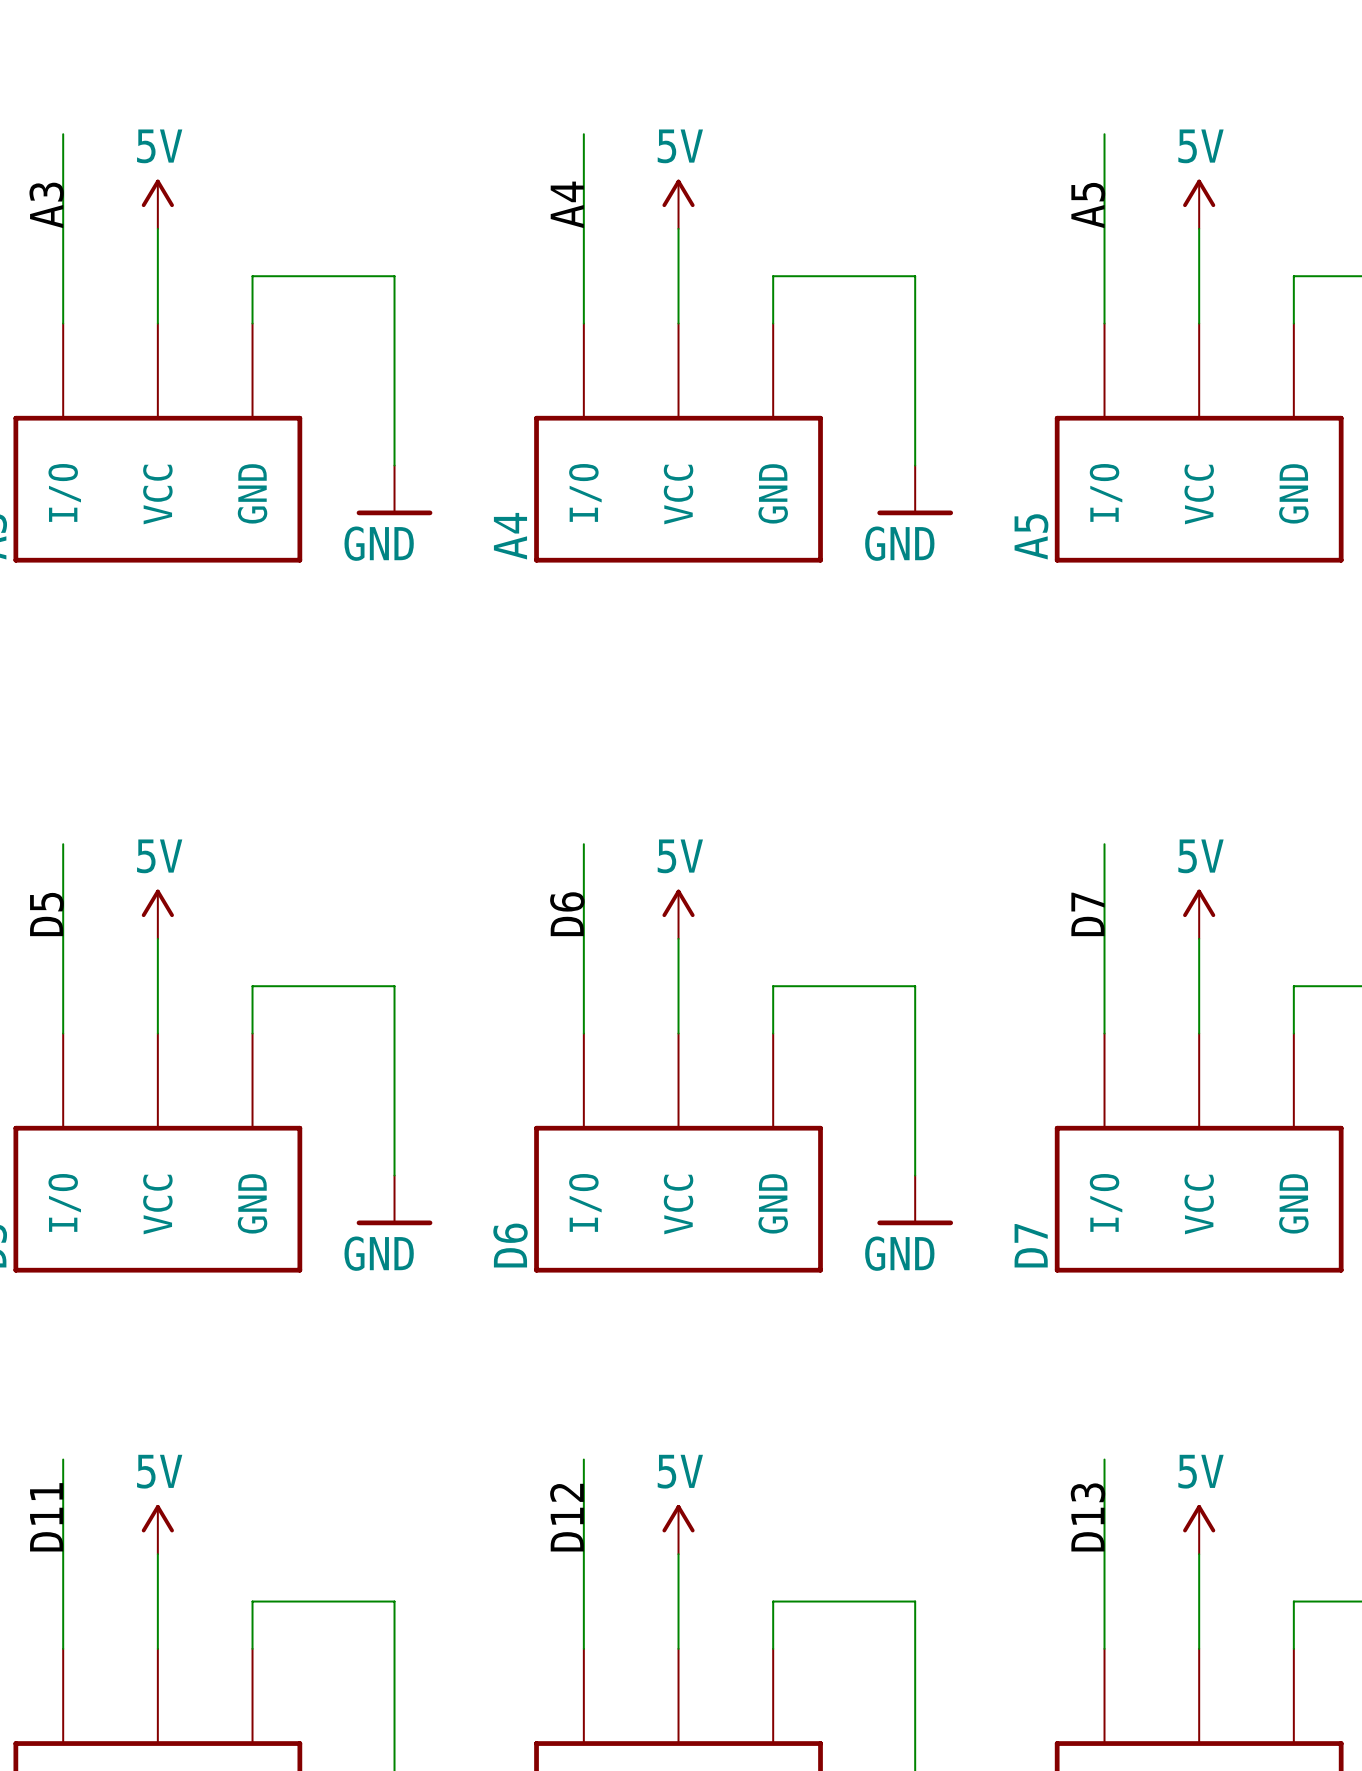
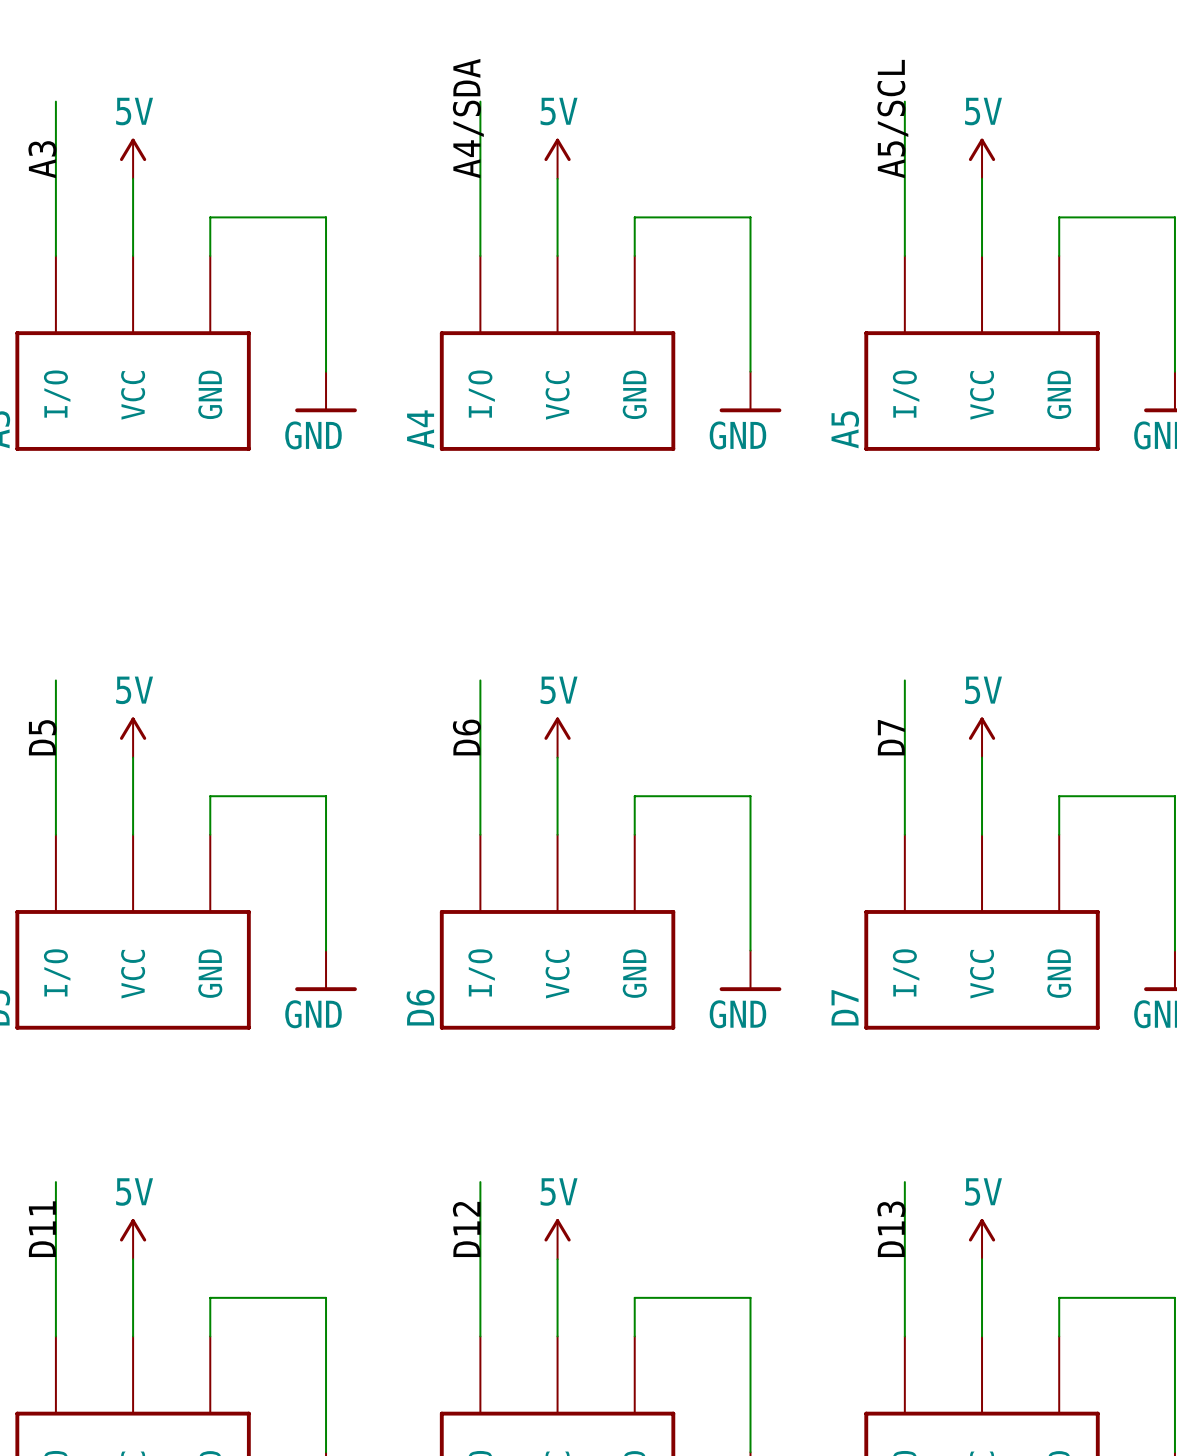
label: A4 (567, 204) -> A4/SDA (468, 118)
label: A5 (1088, 205) -> A5/SCL (892, 119)

